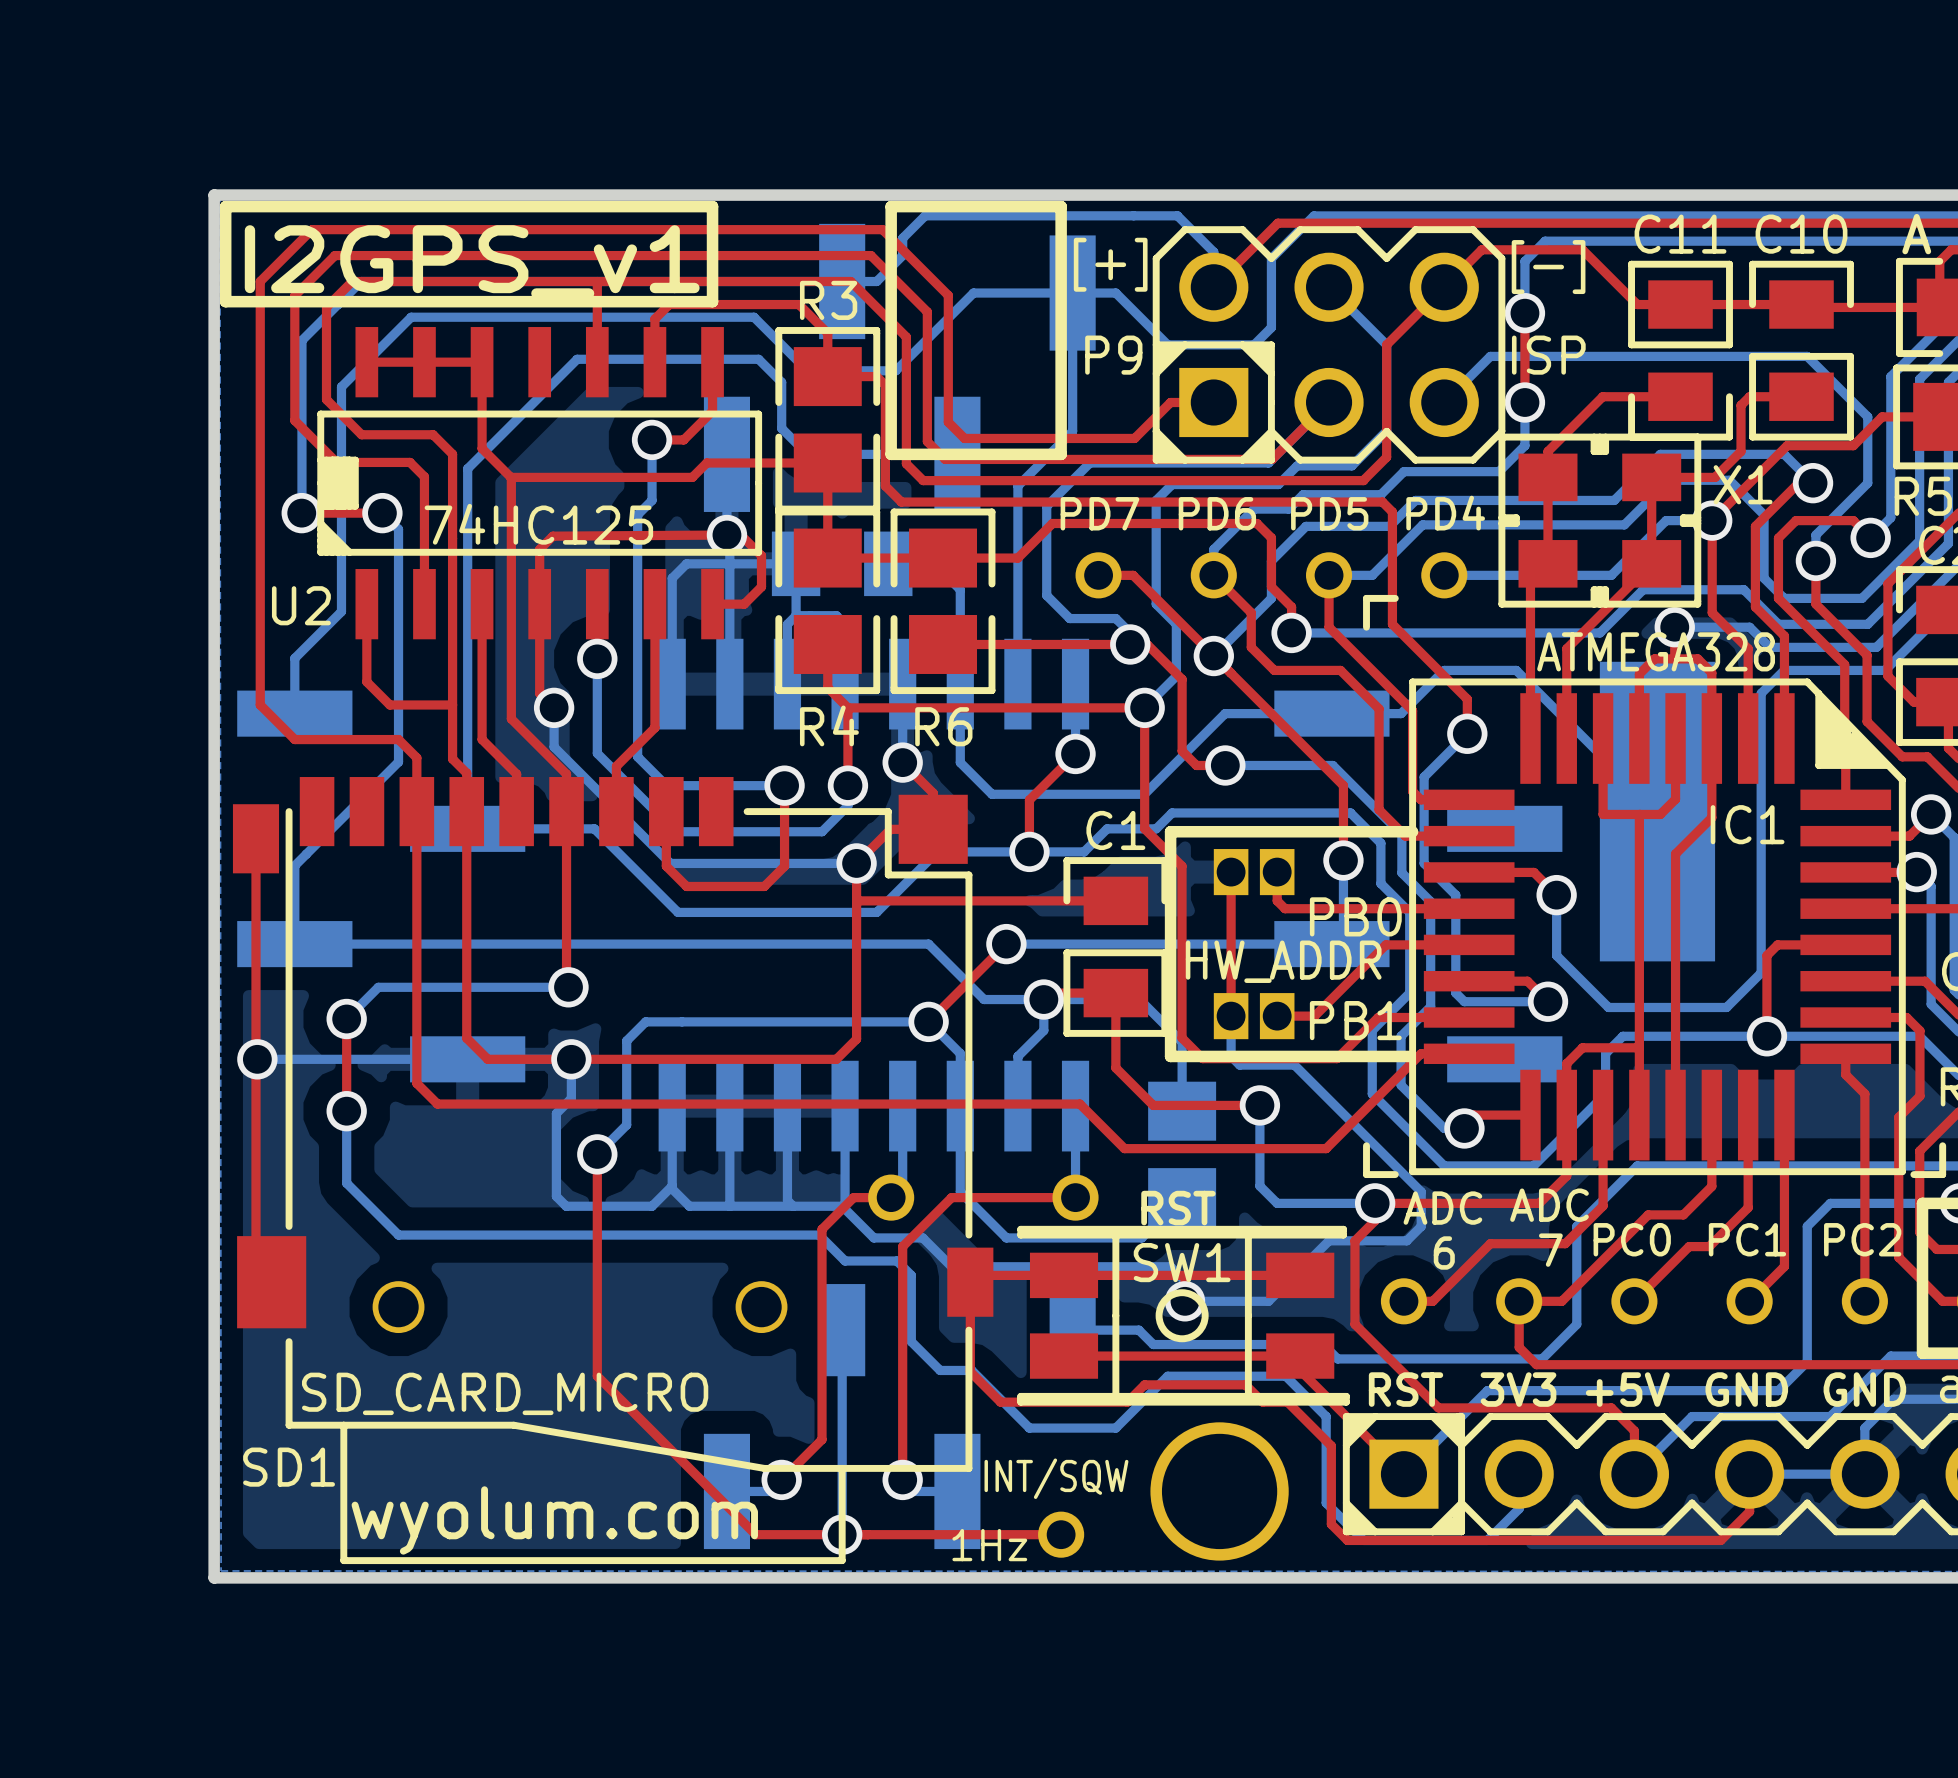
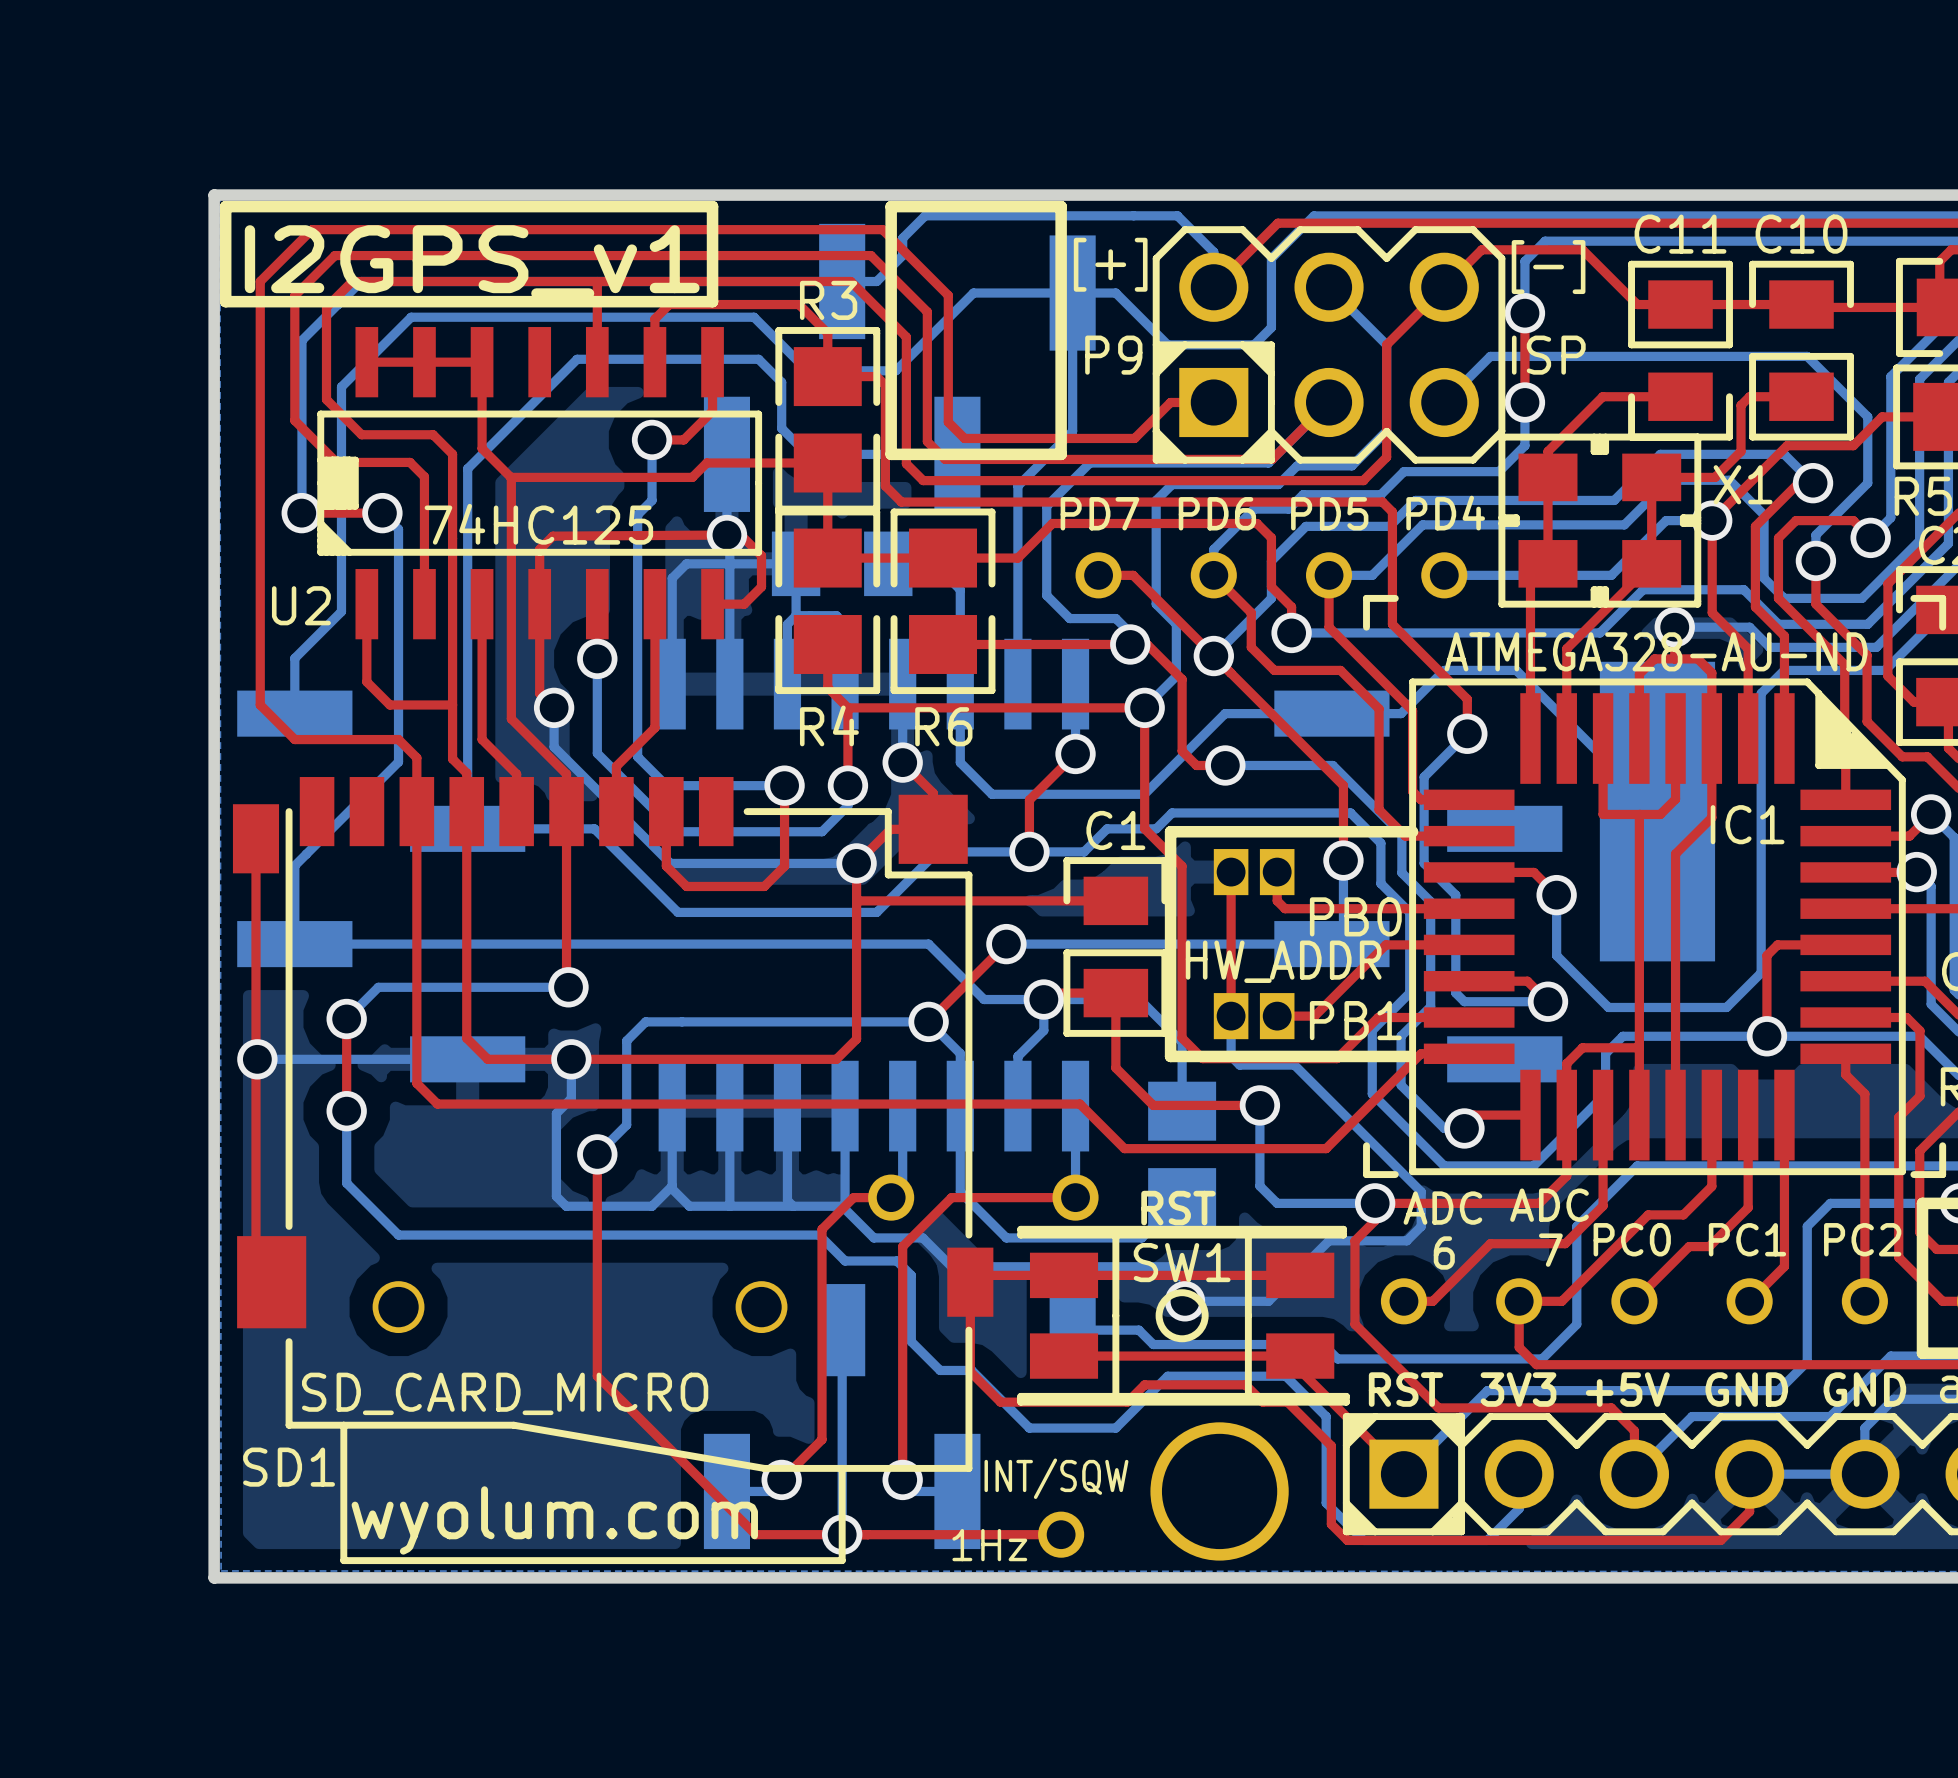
text: A (1916, 234) -> none
drawing shape: [1363, 594, 1947, 1179] -> [1363, 594, 1947, 1179]
IC1 value: ATMEGA328 (1656, 651) -> ATMEGA328-AU-ND (1656, 651)

